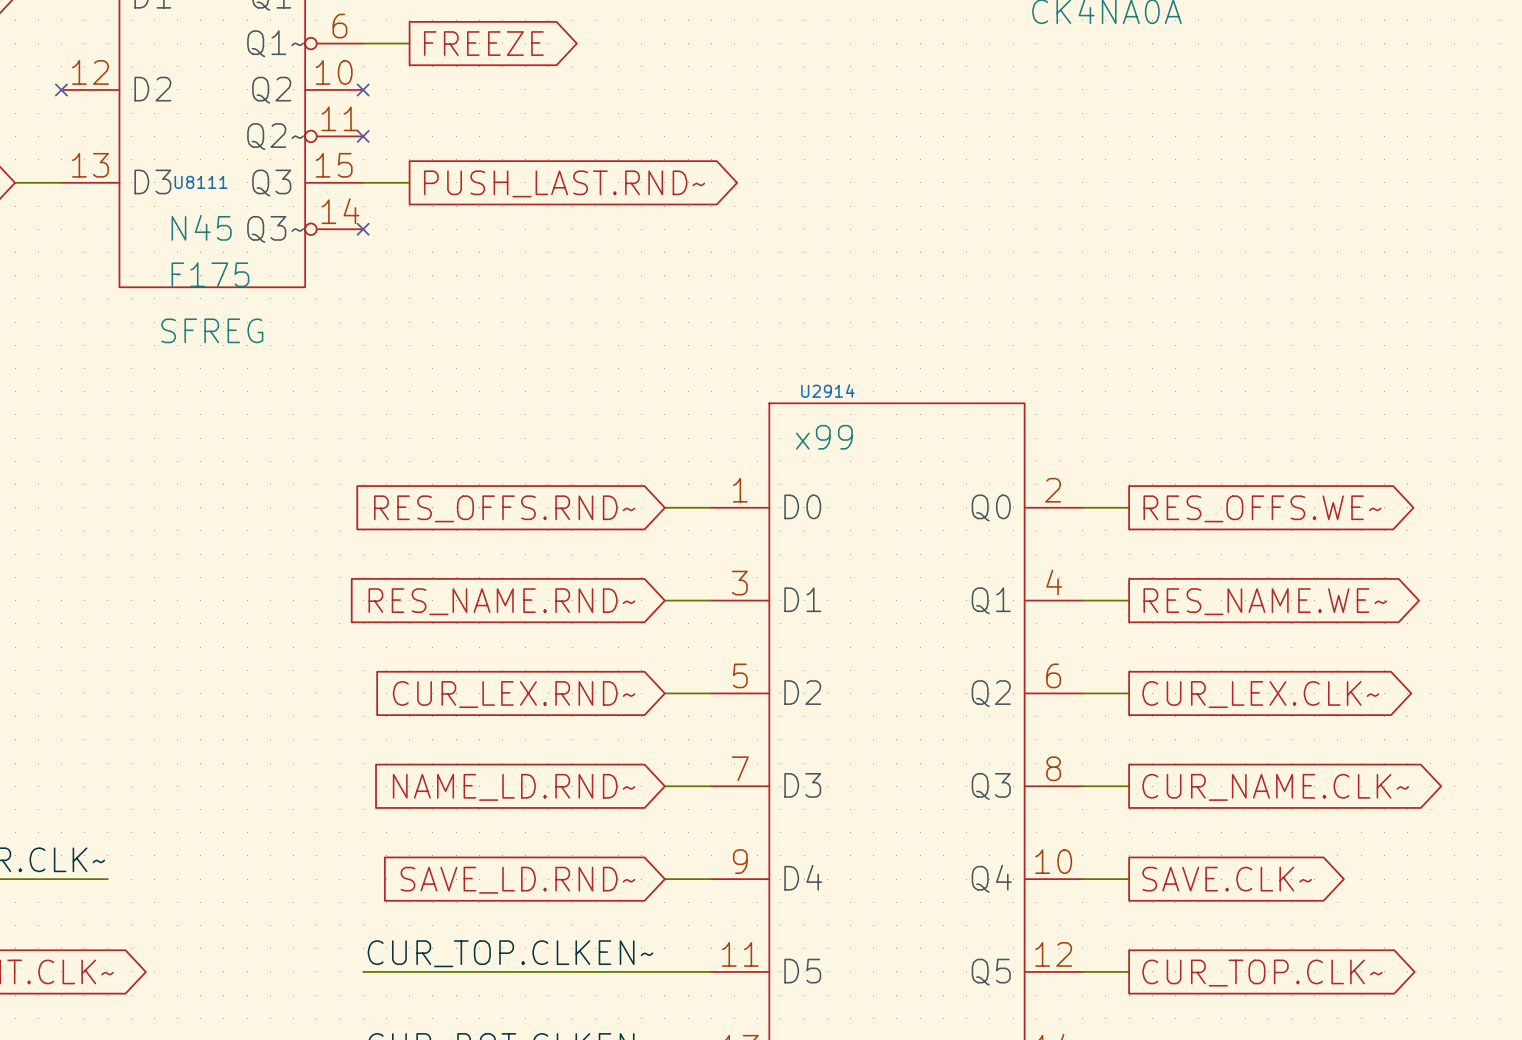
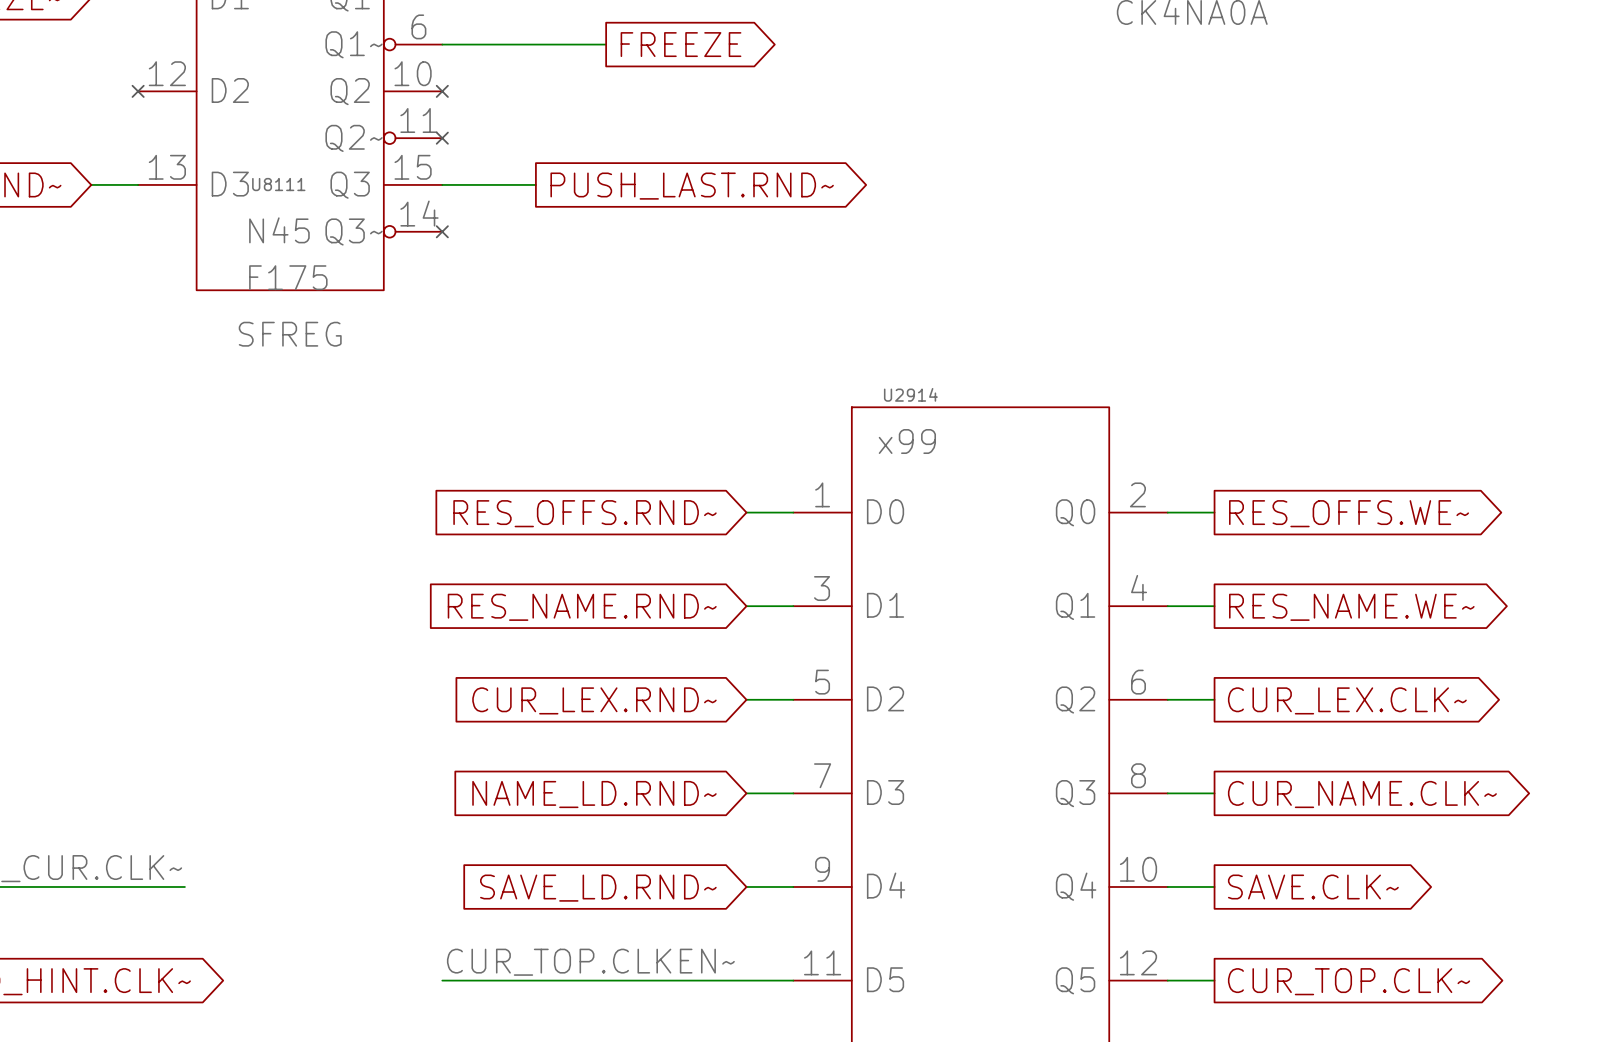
wire: none -> (489, 44) (606, 44)
global label position: FREEZE (483, 43) -> FREEZE (681, 44)
wire: none -> (489, 184) (535, 184)
global label position: PUSH_LAST.RND~ (564, 183) -> PUSH_LAST.RND~ (692, 186)

